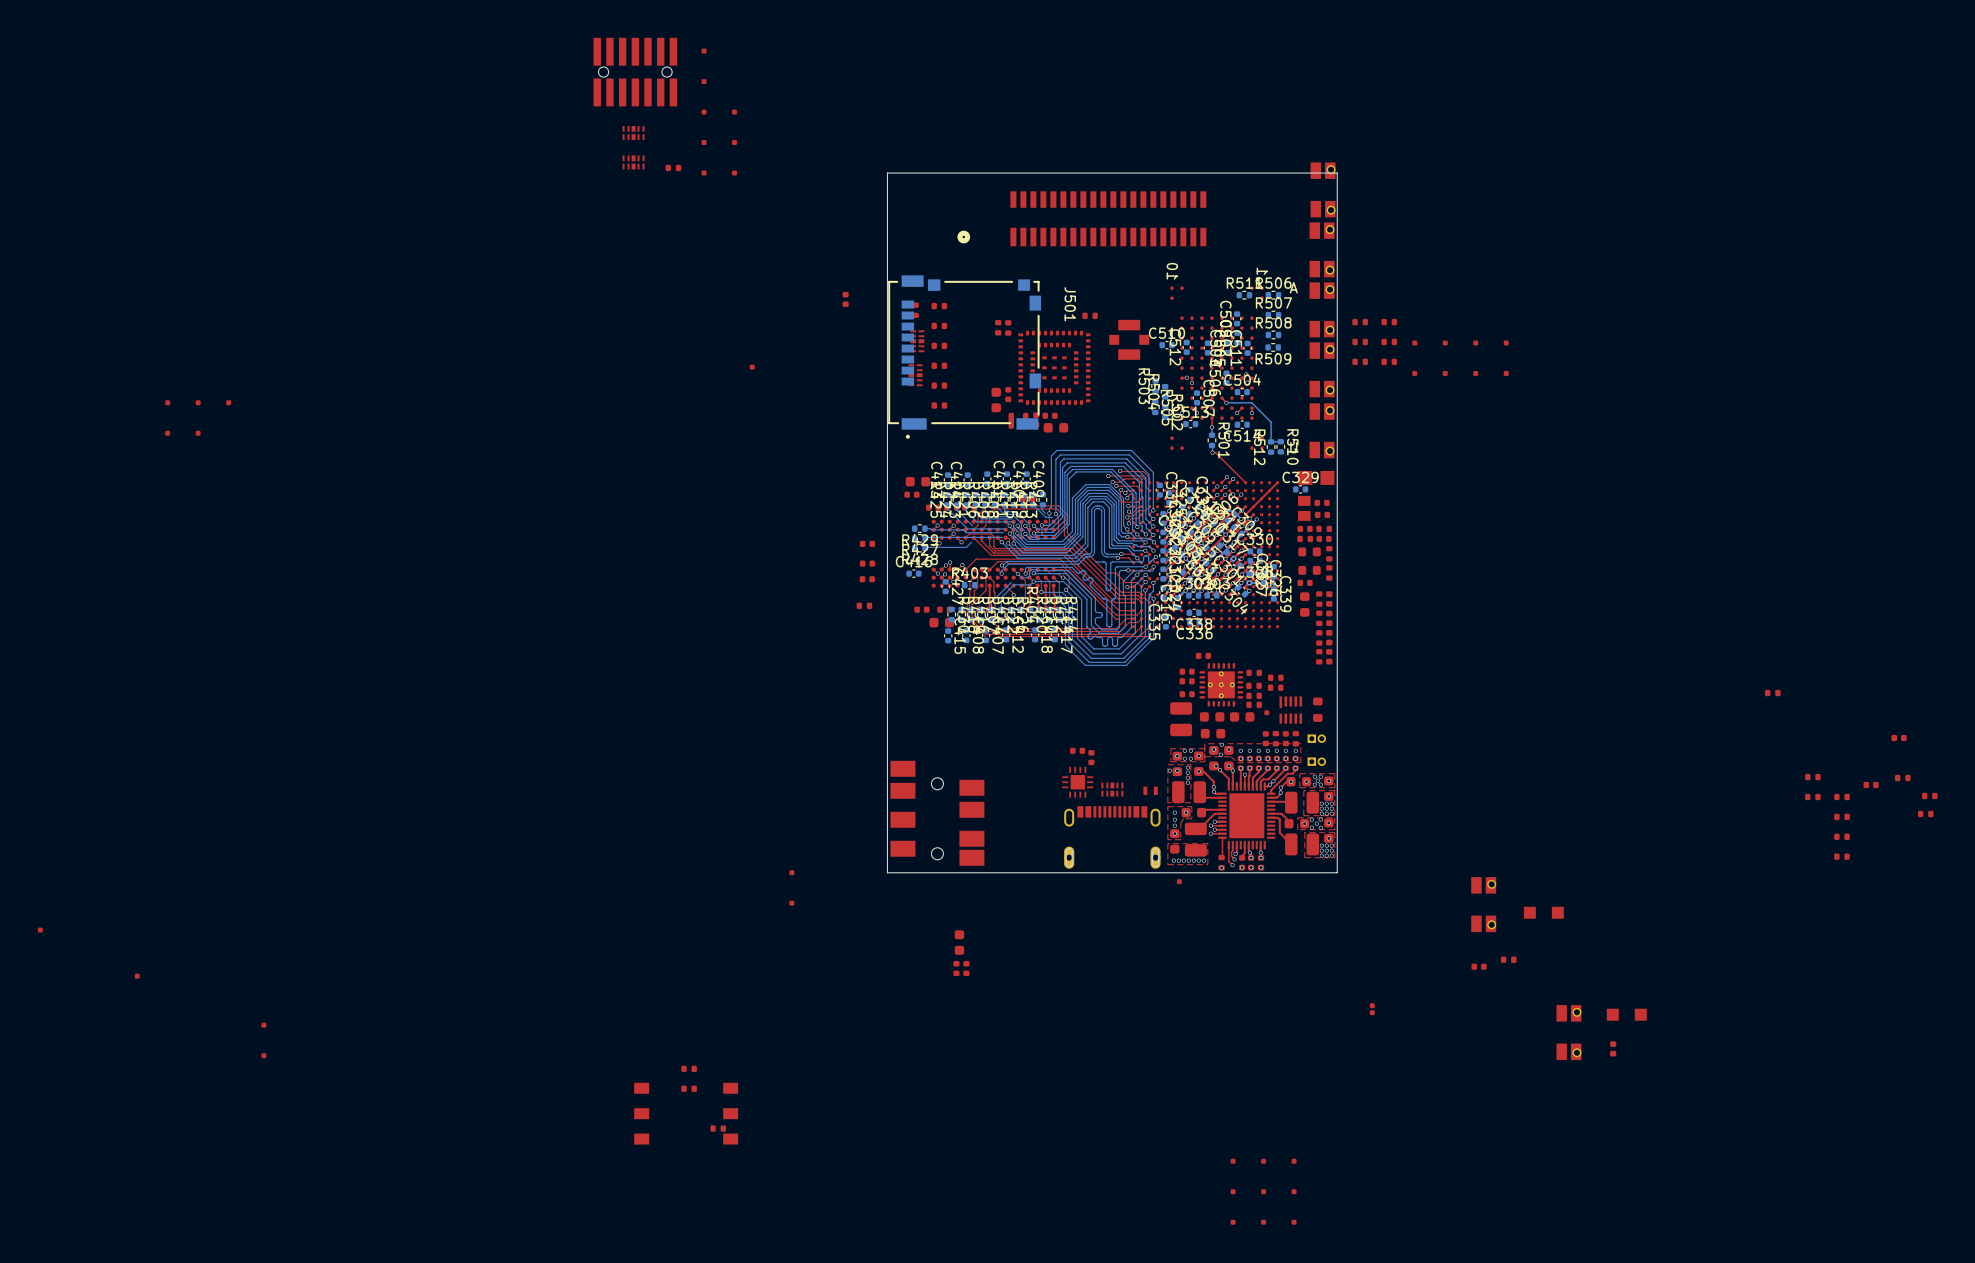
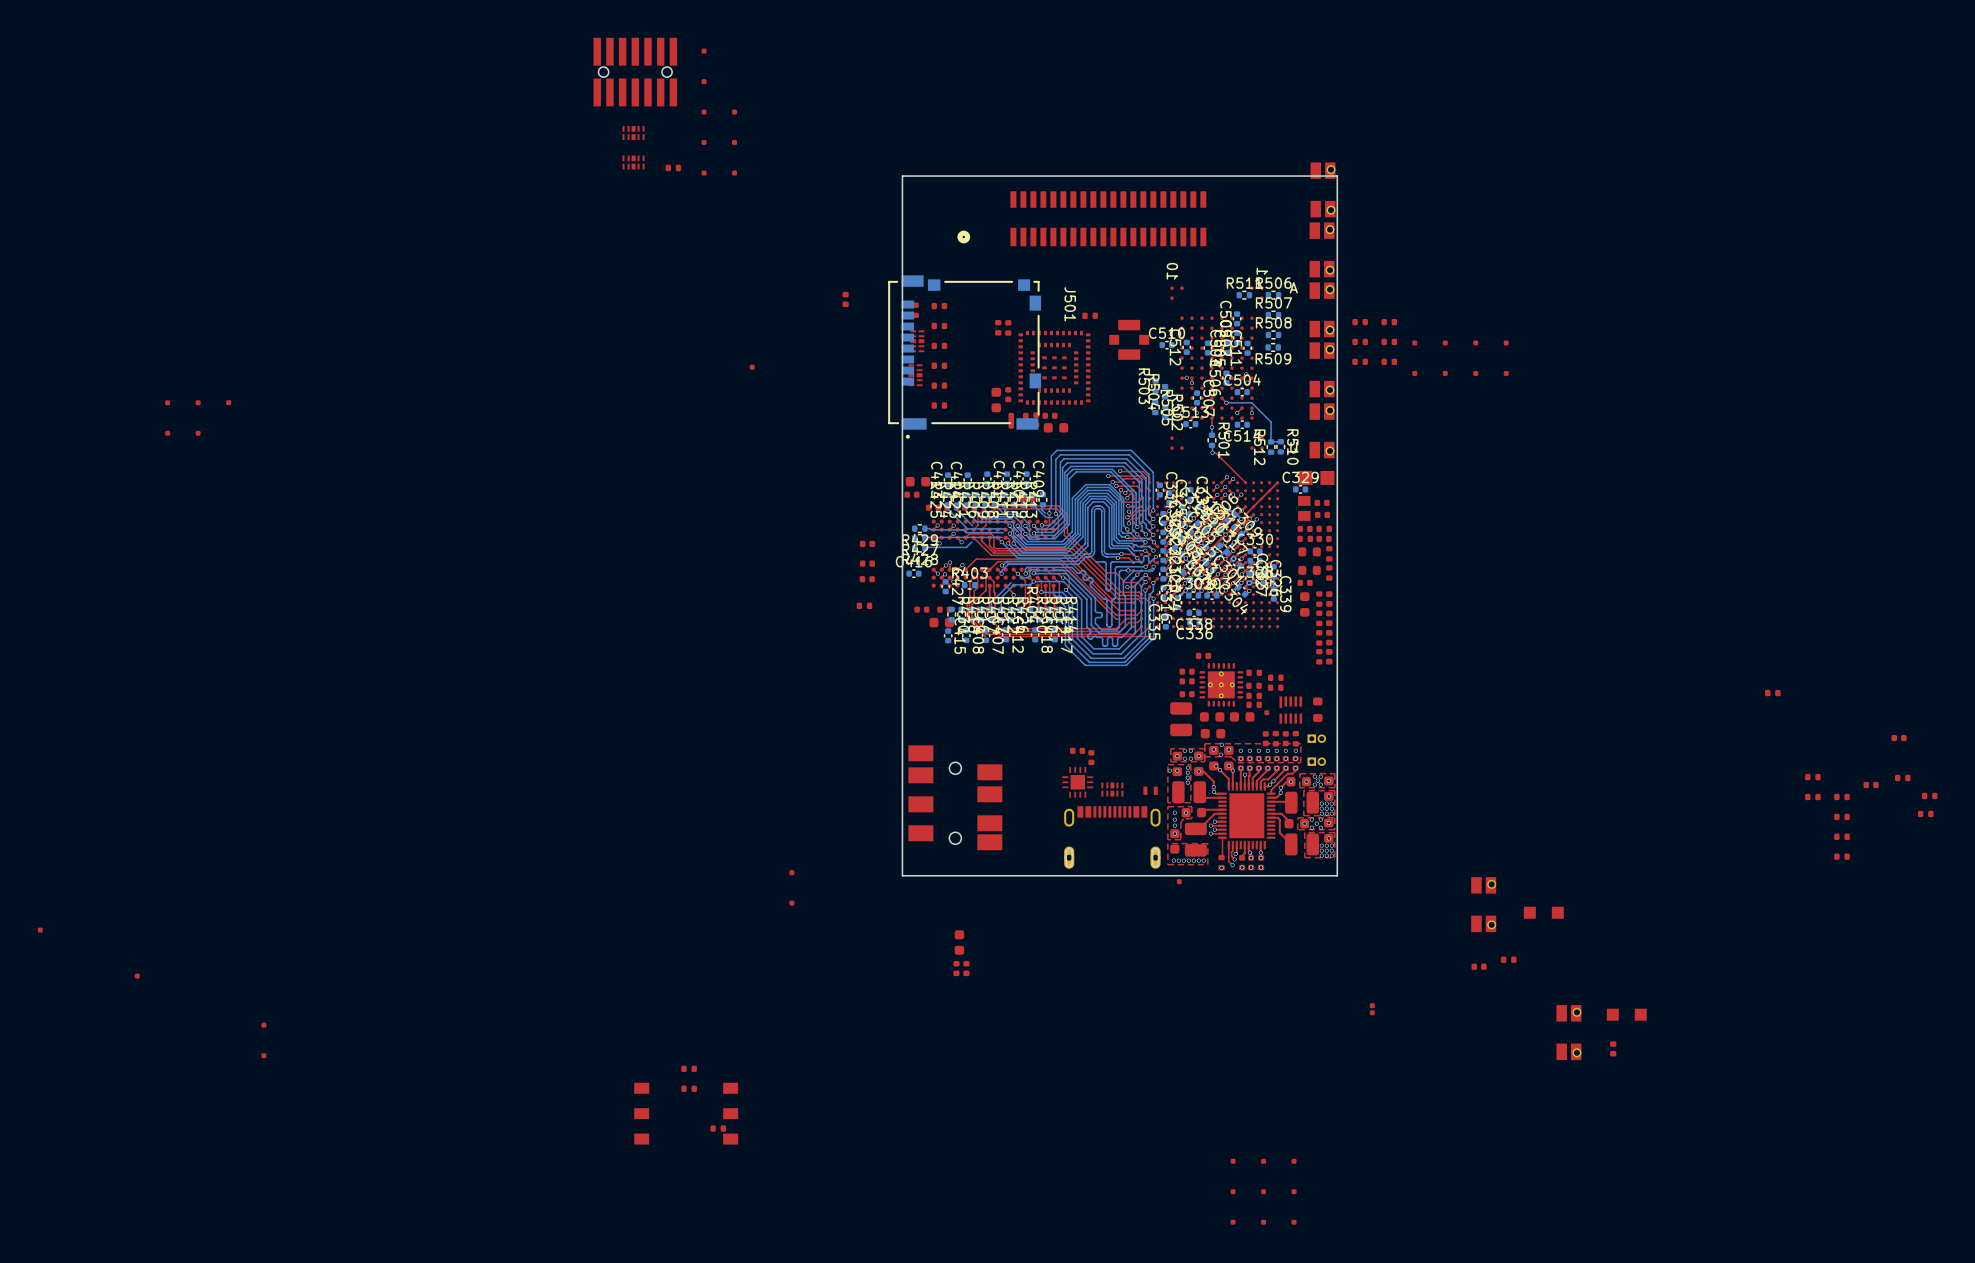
board edge: (1337, 176) (1337, 173) (887, 173) (887, 872) (1337, 872) -> (1337, 176) (902, 176) (902, 875) (1337, 875) (1337, 872)
part position: (937, 813) -> (955, 797)

